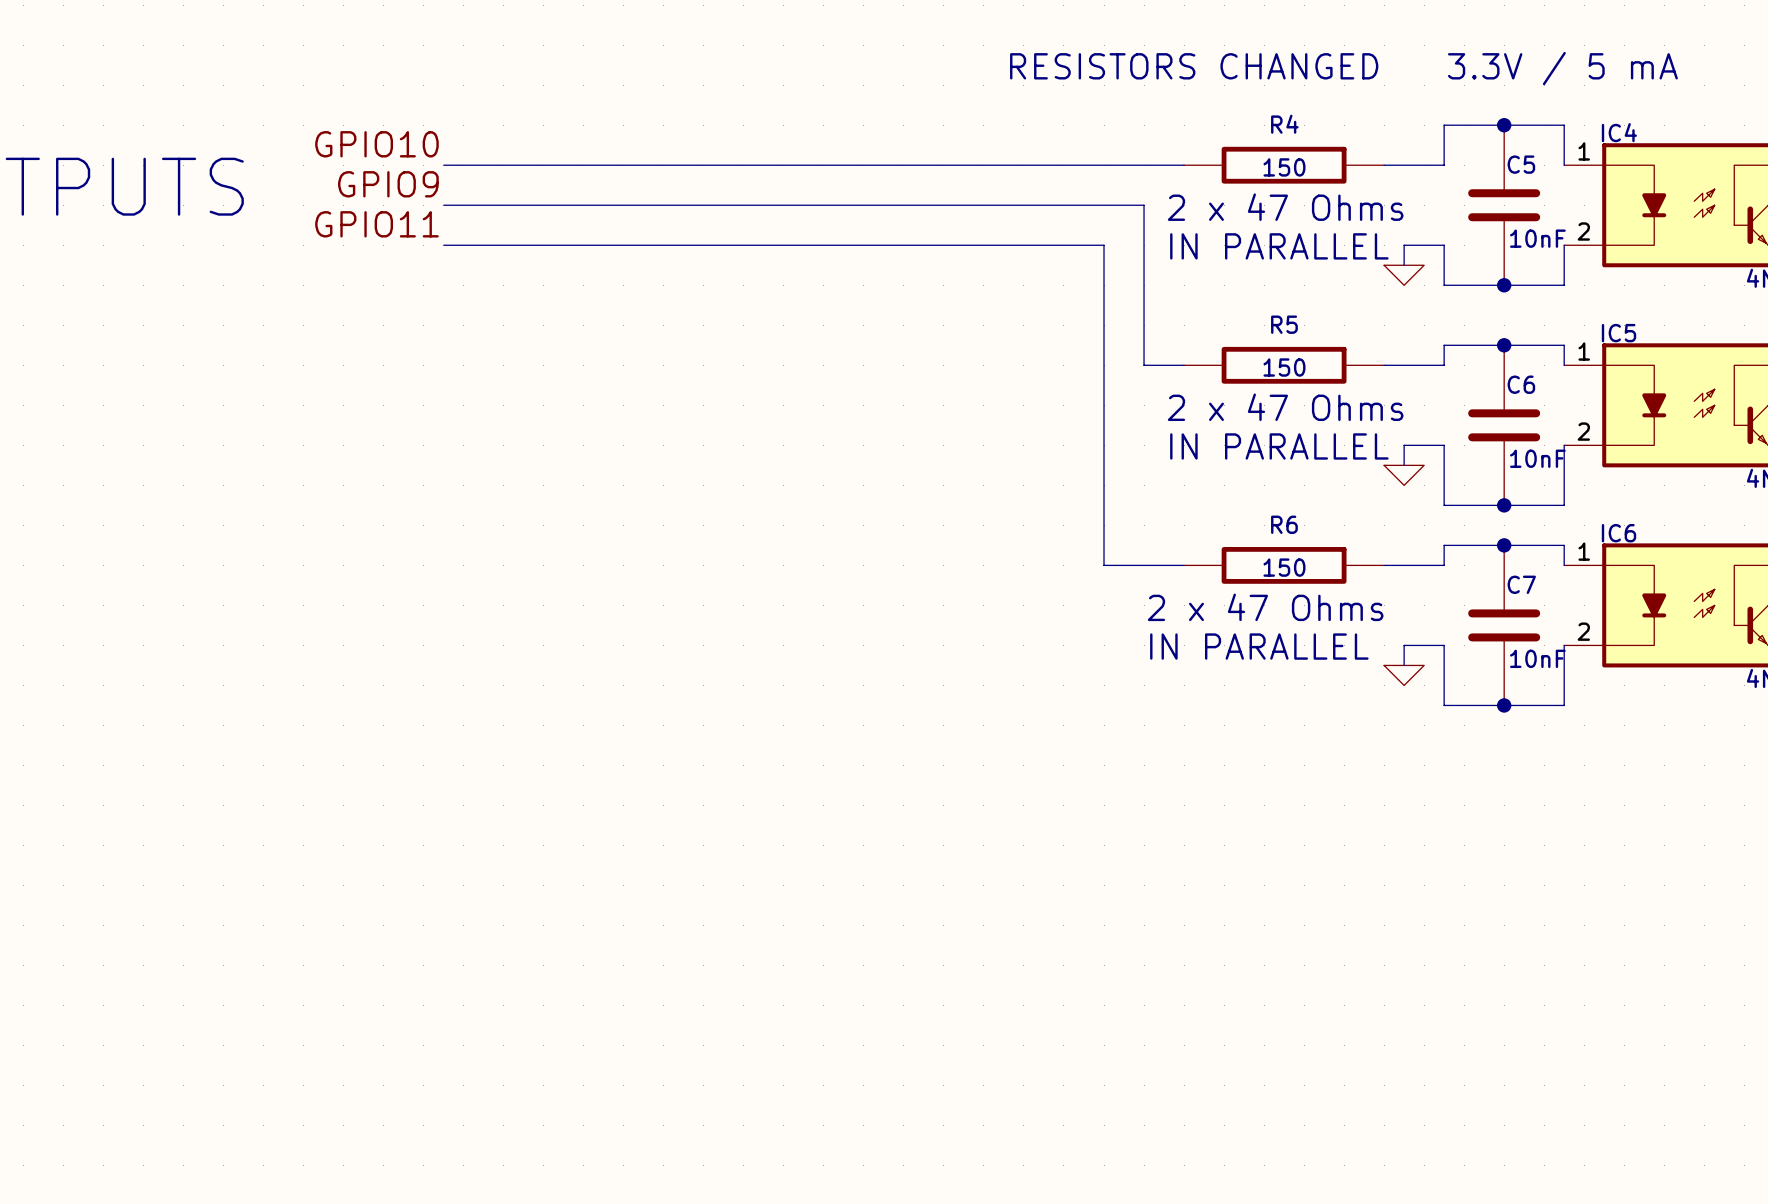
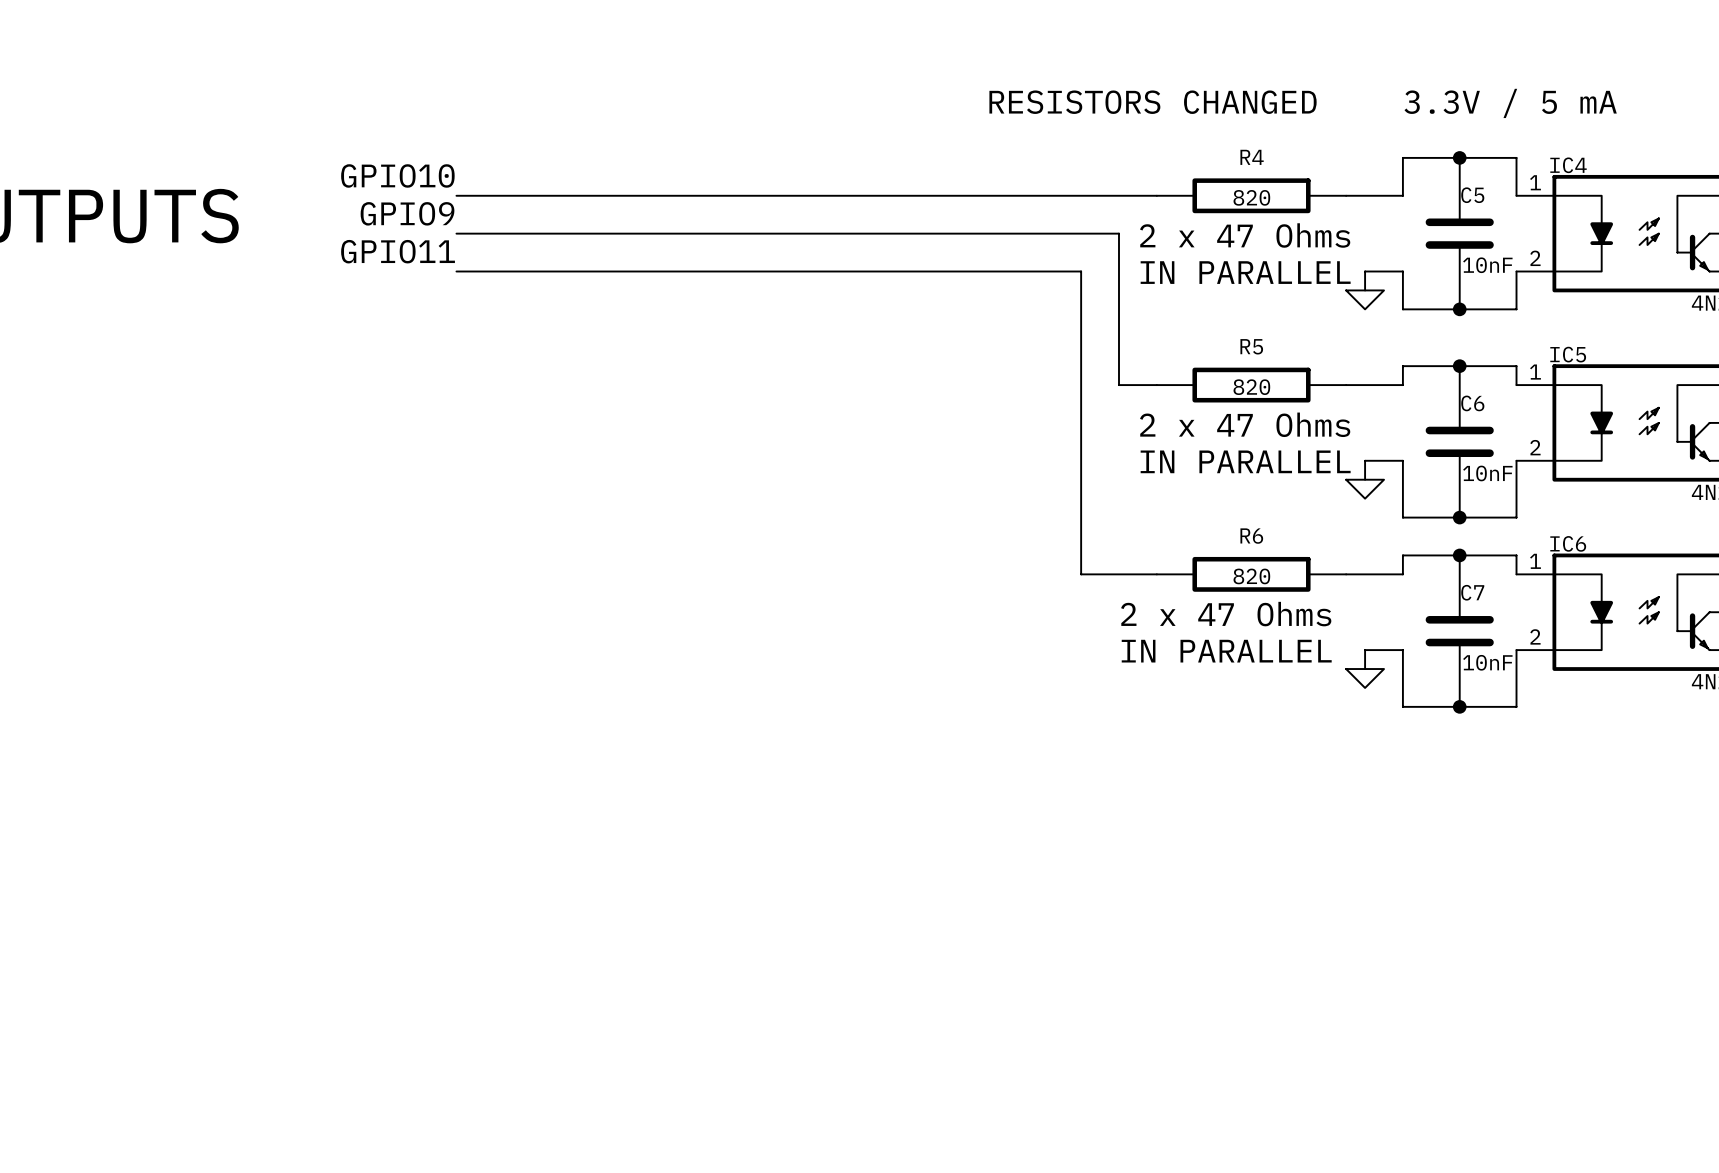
R4 value: 150 (1284, 167) -> 820 (1251, 197)
R5 value: 150 (1284, 367) -> 820 (1251, 387)
R6 value: 150 (1284, 567) -> 820 (1251, 576)

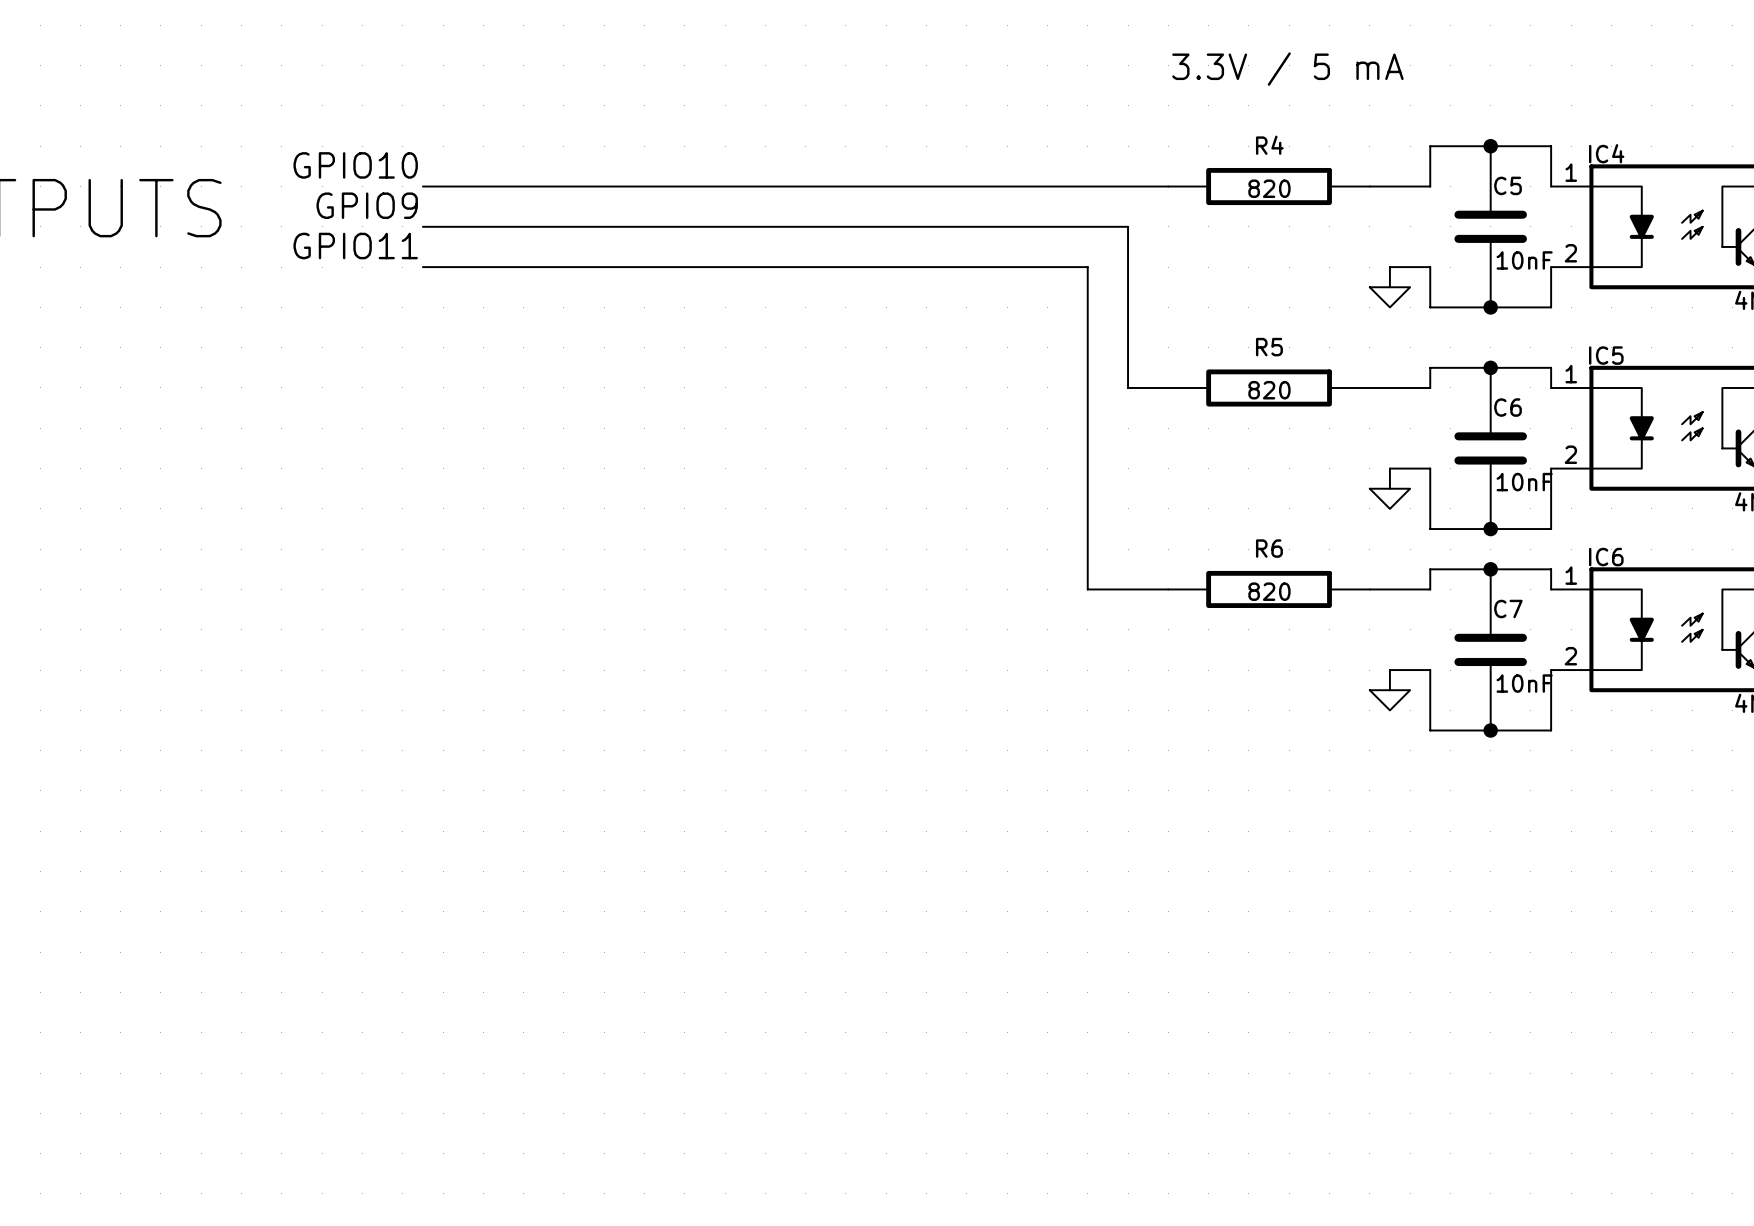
text: RESISTORS CHANGED (1153, 102) -> none
text position: 3.3V / 5 mA (1510, 103) -> 3.3V / 5 mA (1287, 69)
text: 2 x 47 Ohms (1245, 235) -> none
text: IN PARALLEL (1245, 272) -> none
text: 2 x 47 Ohms (1245, 424) -> none
text: IN PARALLEL (1245, 461) -> none
text: 2 x 47 Ohms (1226, 614) -> none
text: IN PARALLEL (1226, 651) -> none

